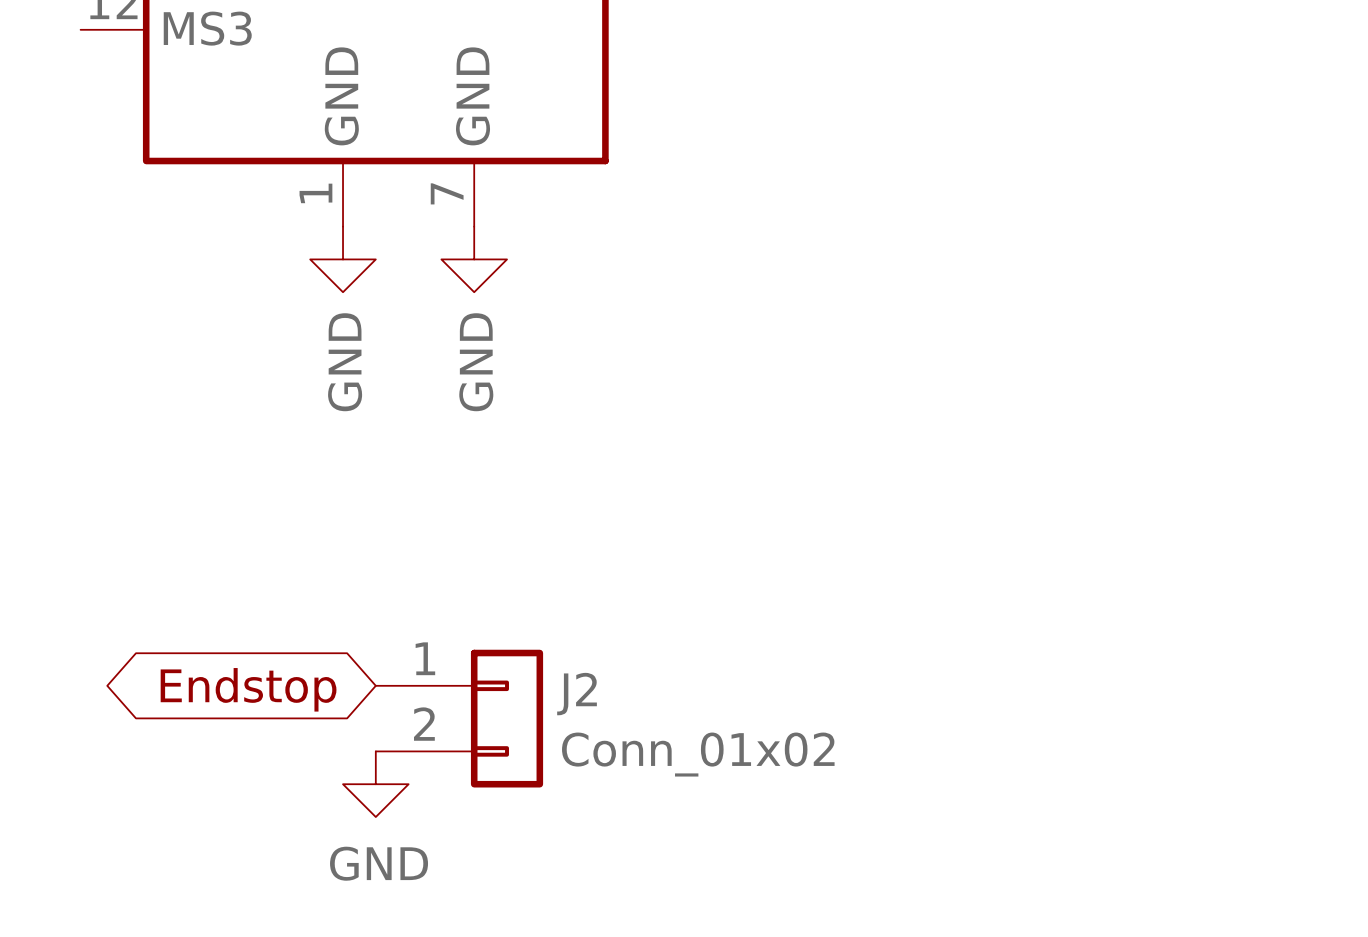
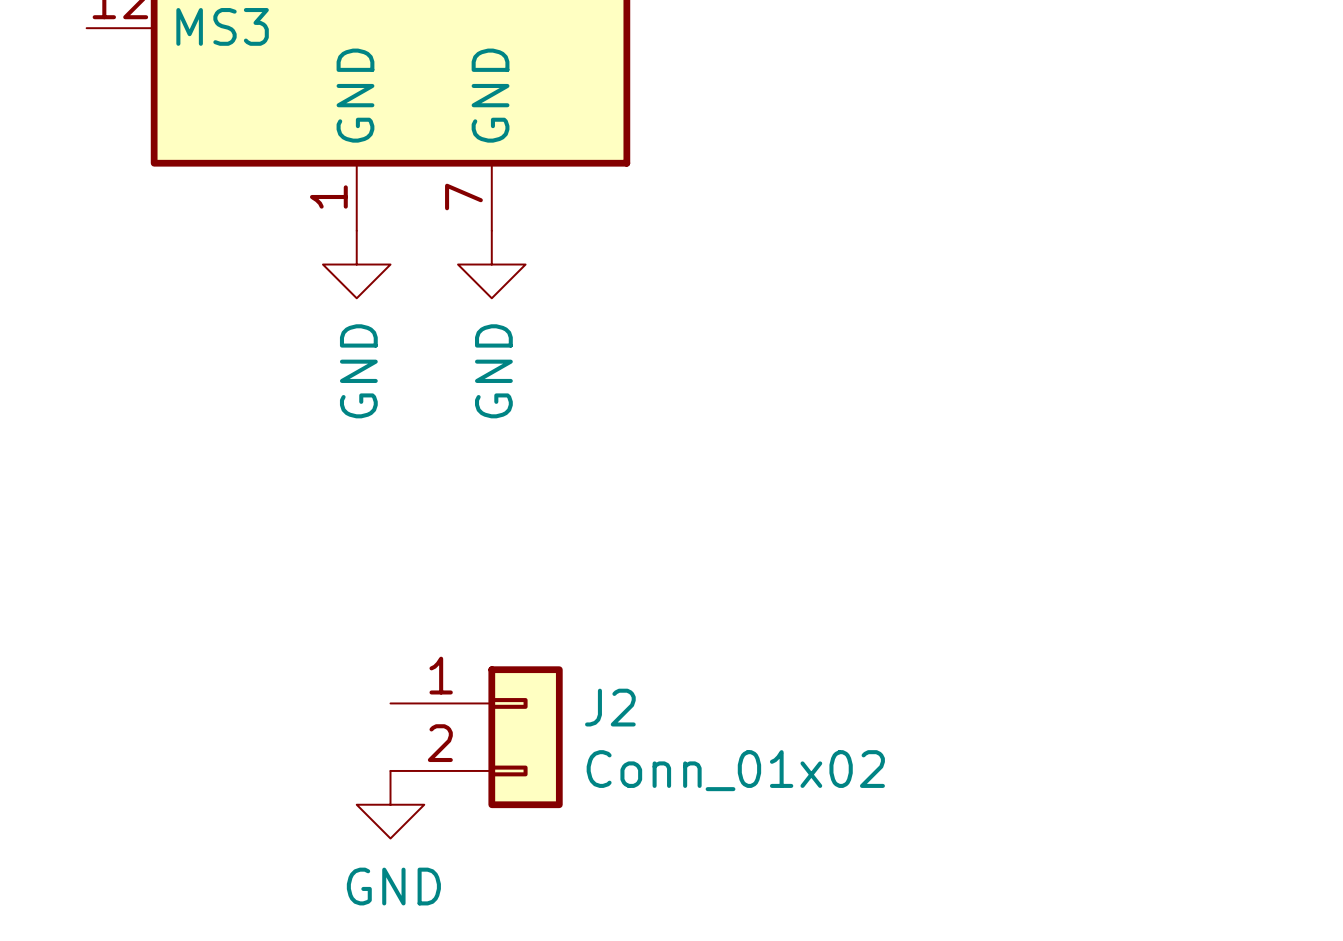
global label: Endstop (248, 689) -> none

